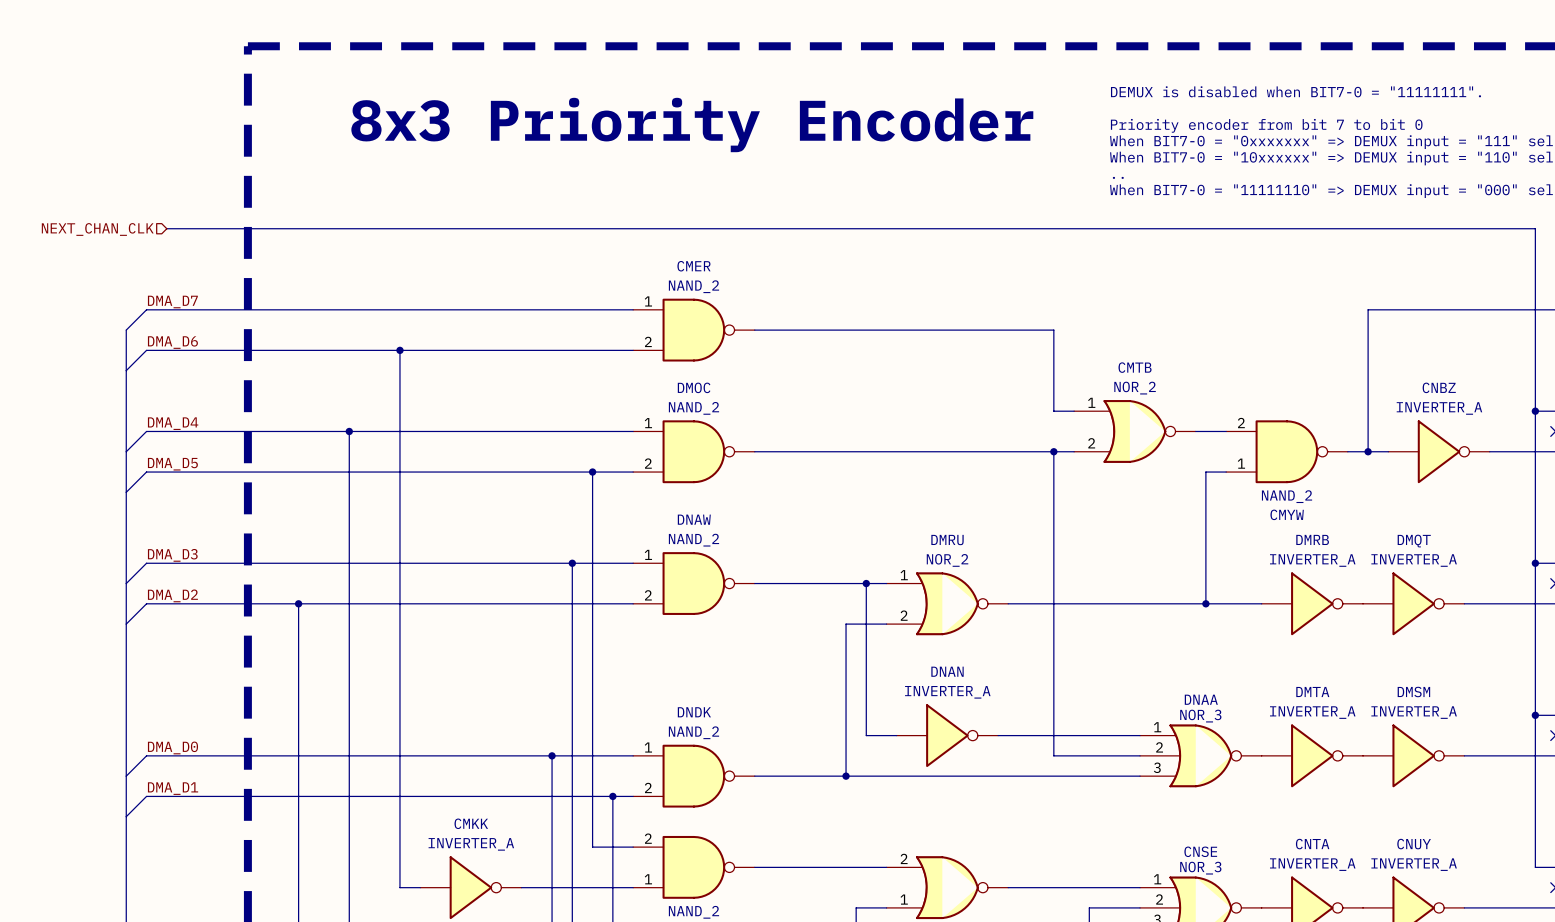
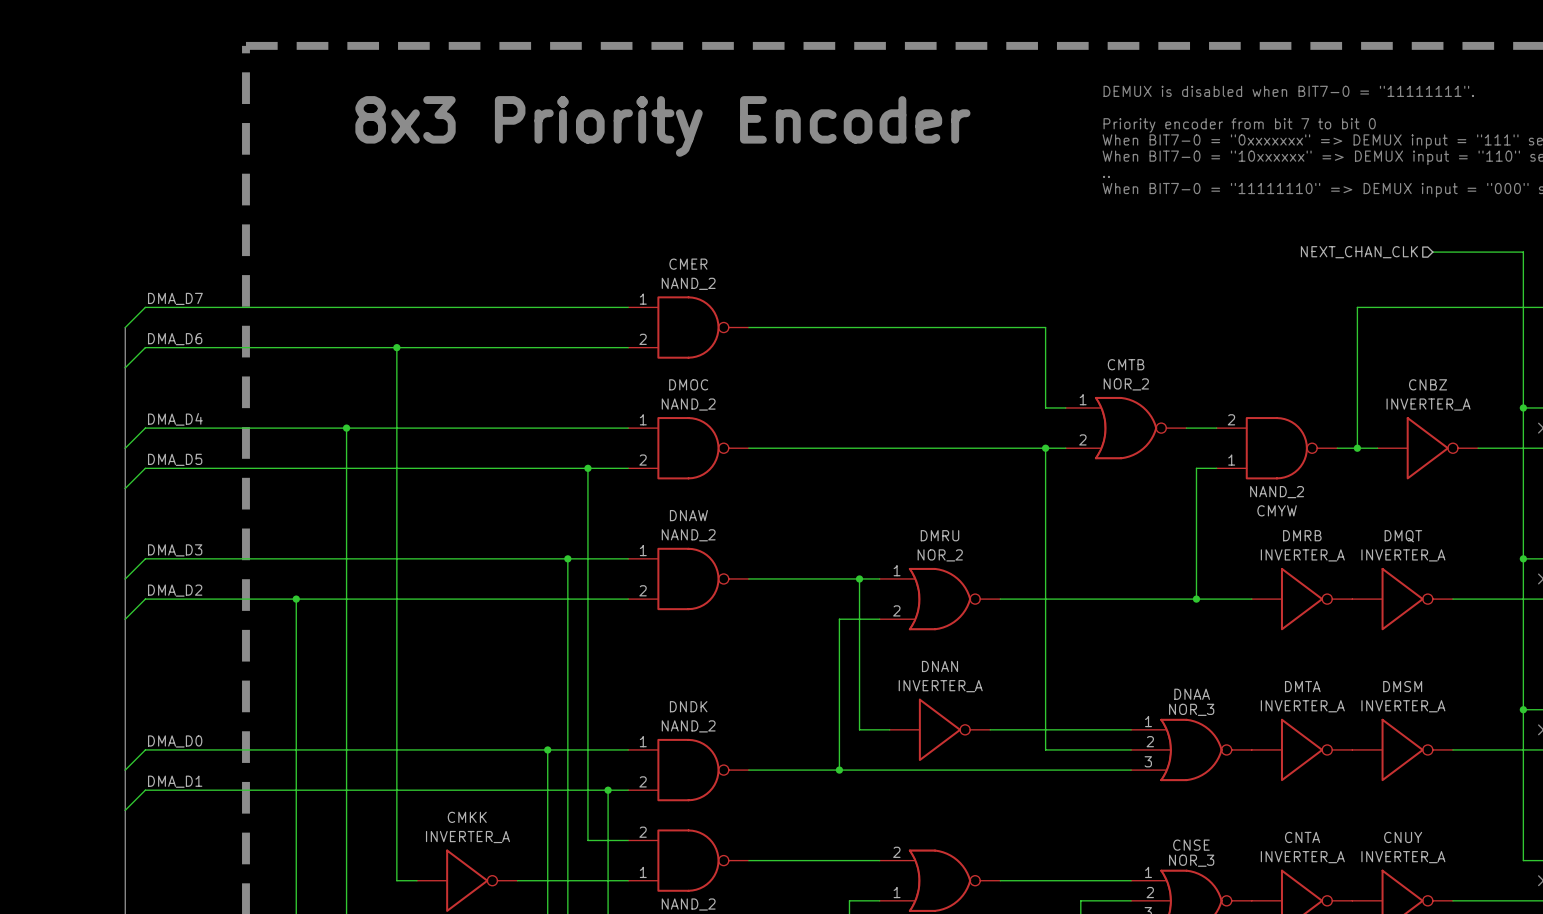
wire: (166, 228) (1535, 228) (1535, 254) -> (1432, 252) (1523, 252)
hierarchical label: NEXT_CHAN_CLK (97, 229) -> none
hierarchical label: none -> NEXT_CHAN_CLK (1359, 252)

